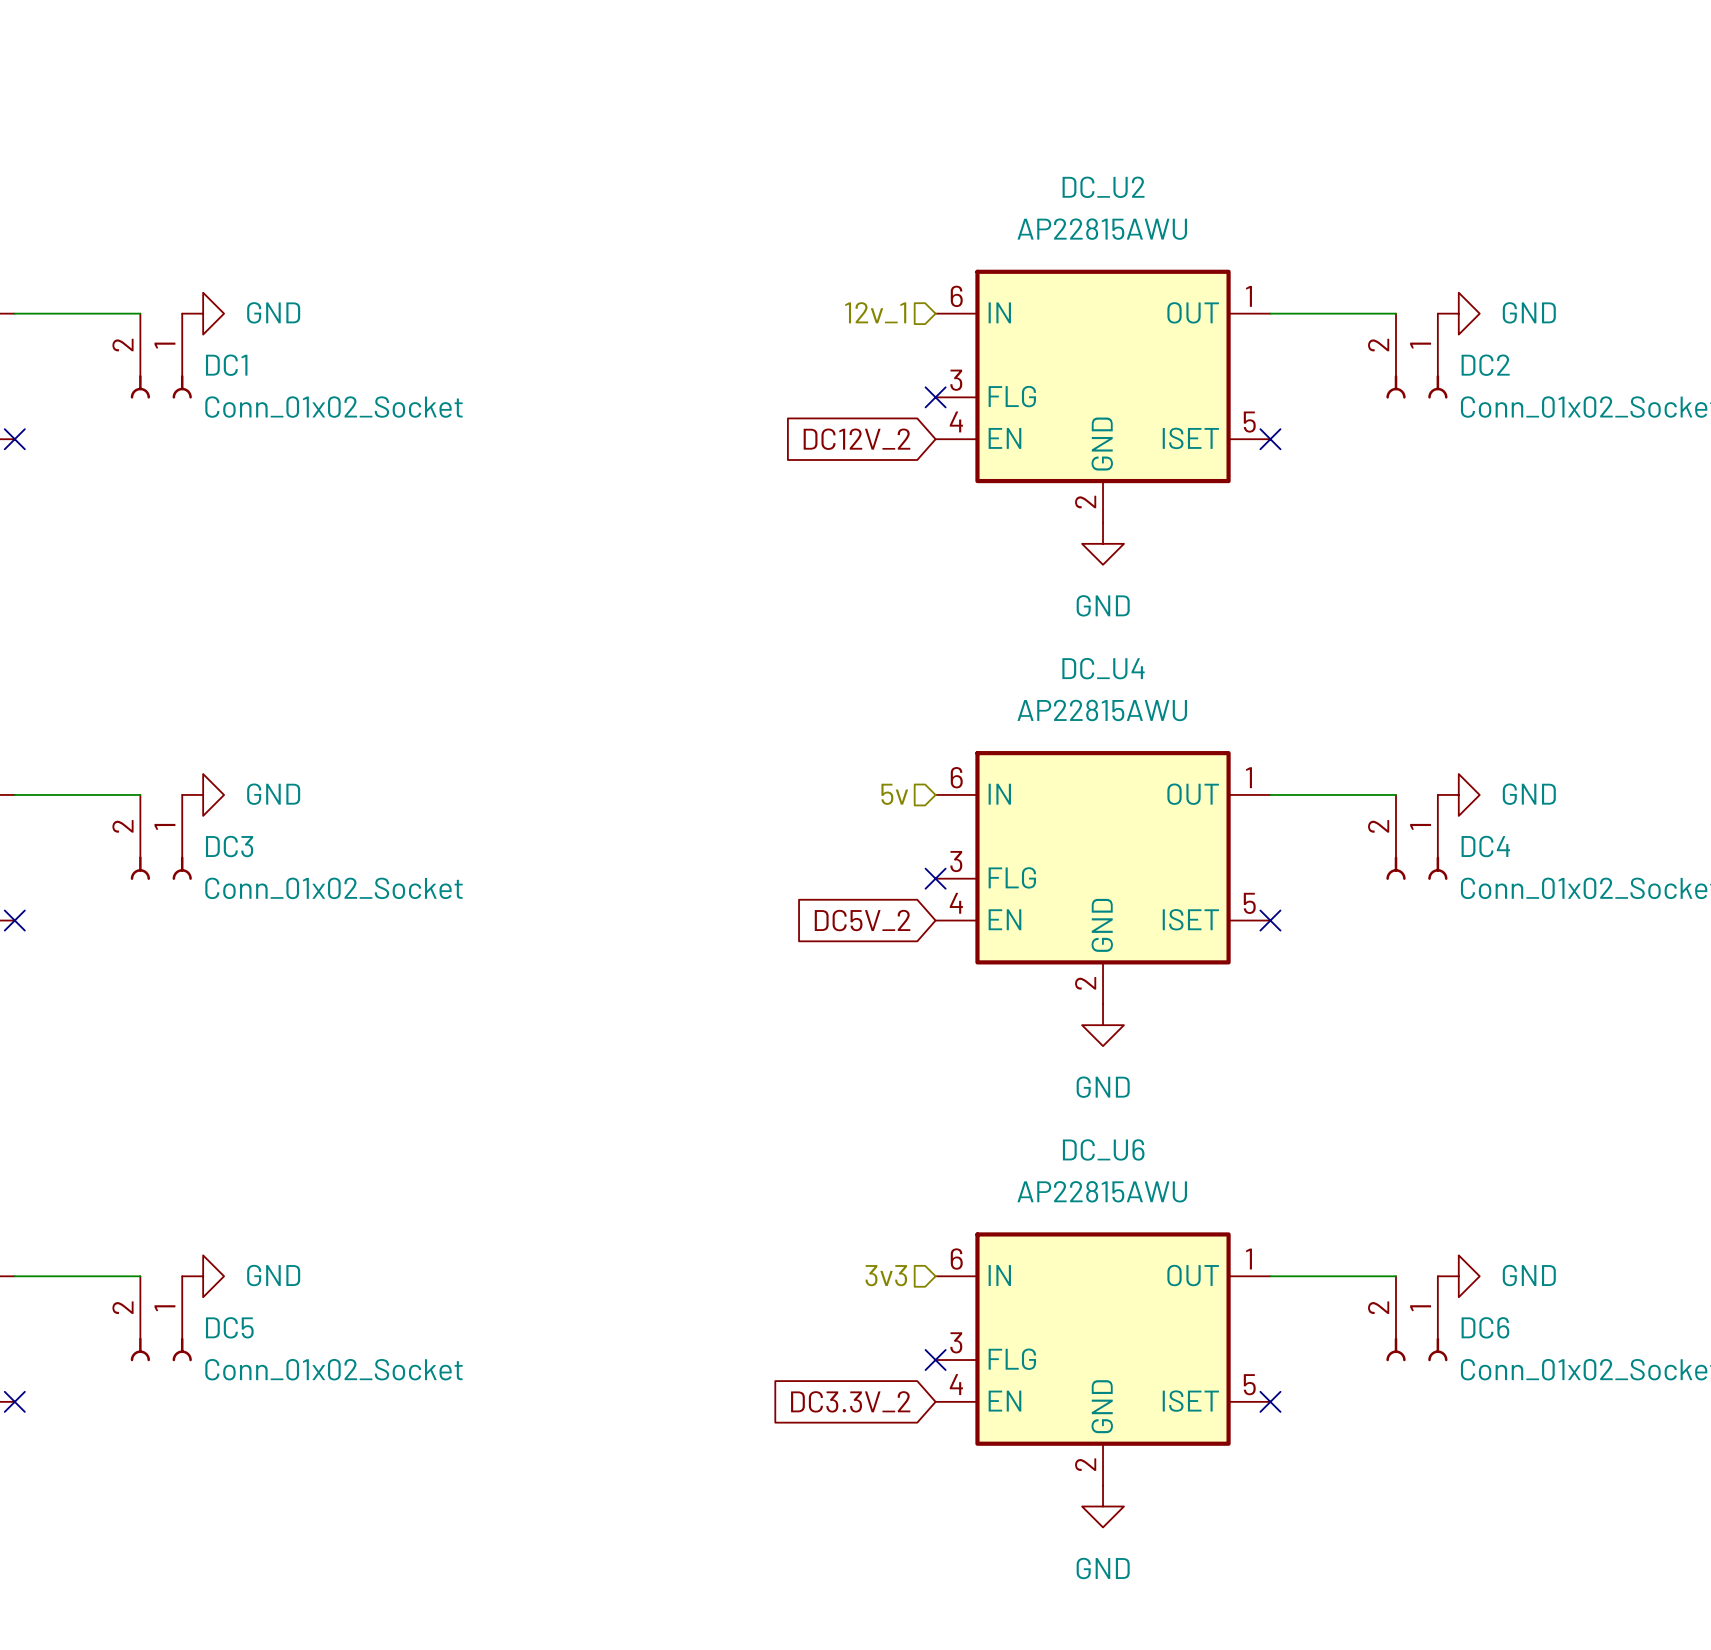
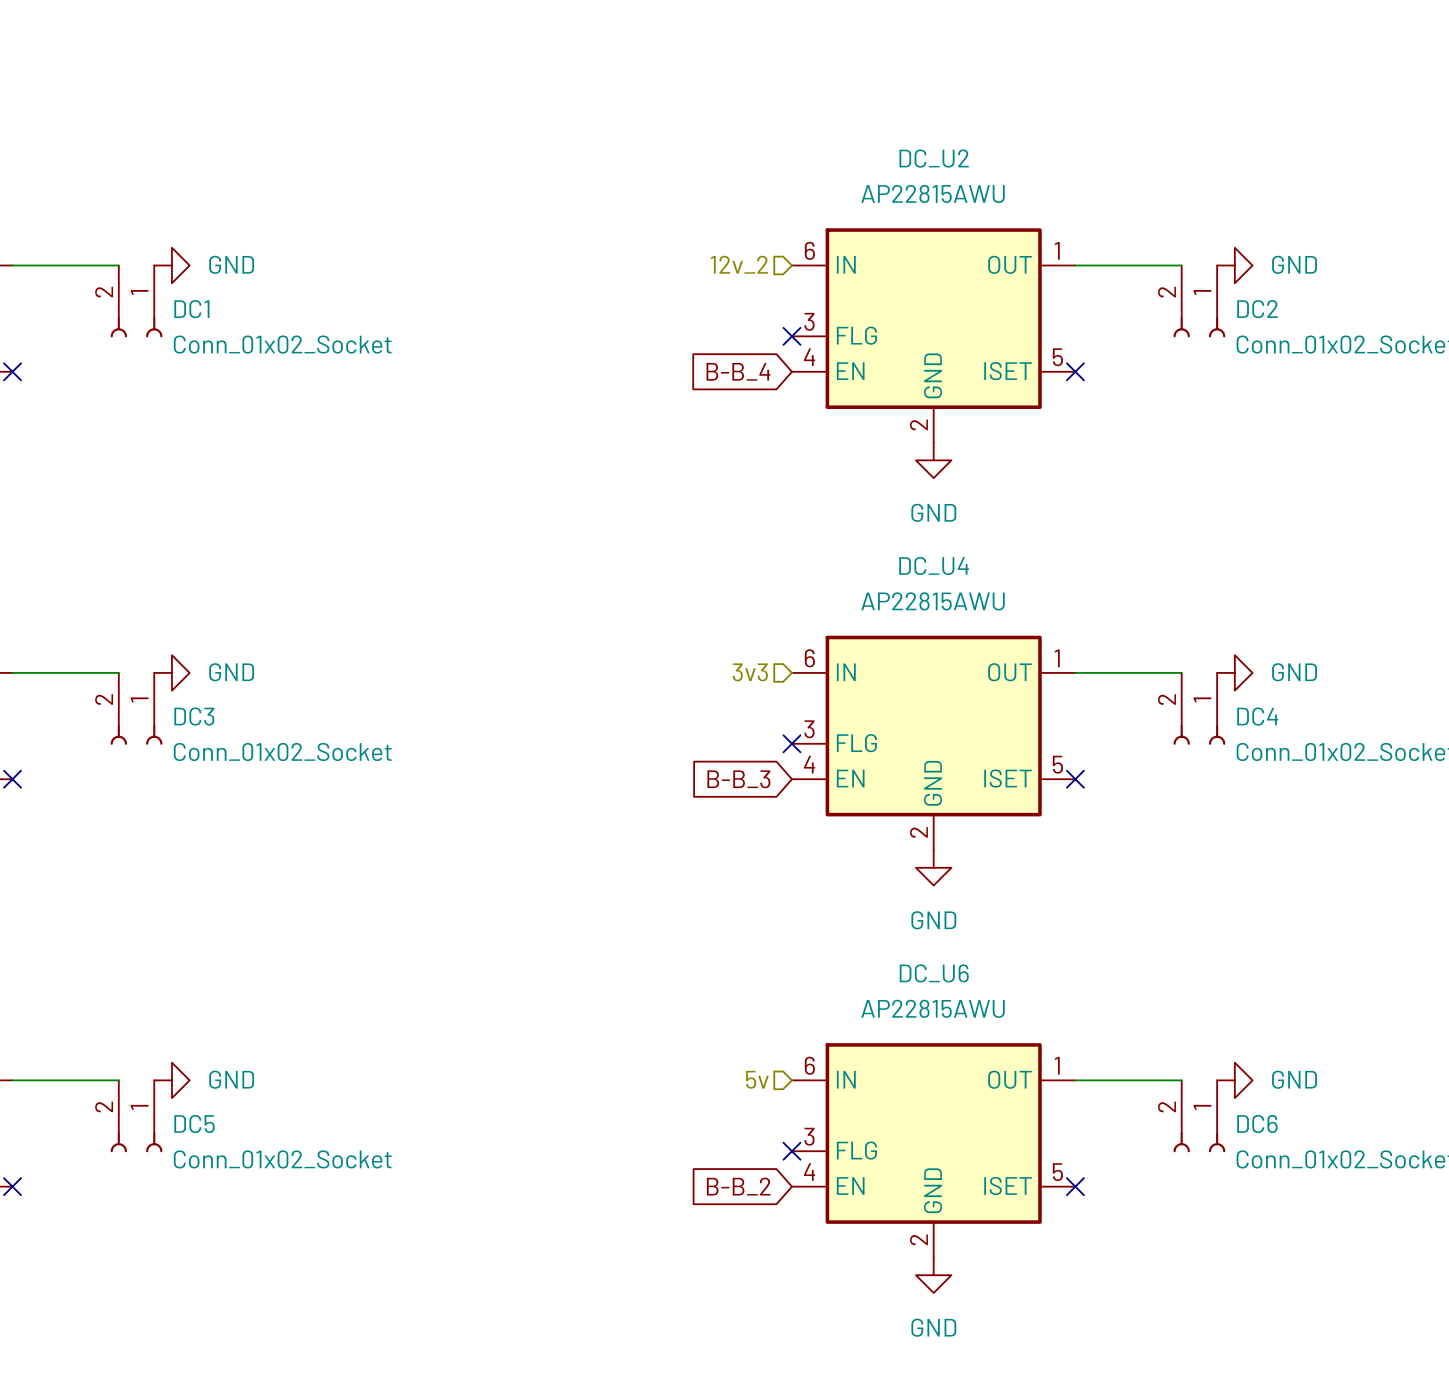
hierarchical label: 12v_1 (875, 312) -> 12v_2 (739, 264)
global label: DC12V_2 (856, 439) -> B-B_4 (738, 371)
hierarchical label: 5v (894, 794) -> 3v3 (750, 672)
global label: DC5V_2 (862, 920) -> B-B_3 (738, 779)
hierarchical label: 3v3 (886, 1275) -> 5v (757, 1079)
global label: DC3.3V_2 (850, 1401) -> B-B_2 (738, 1186)

